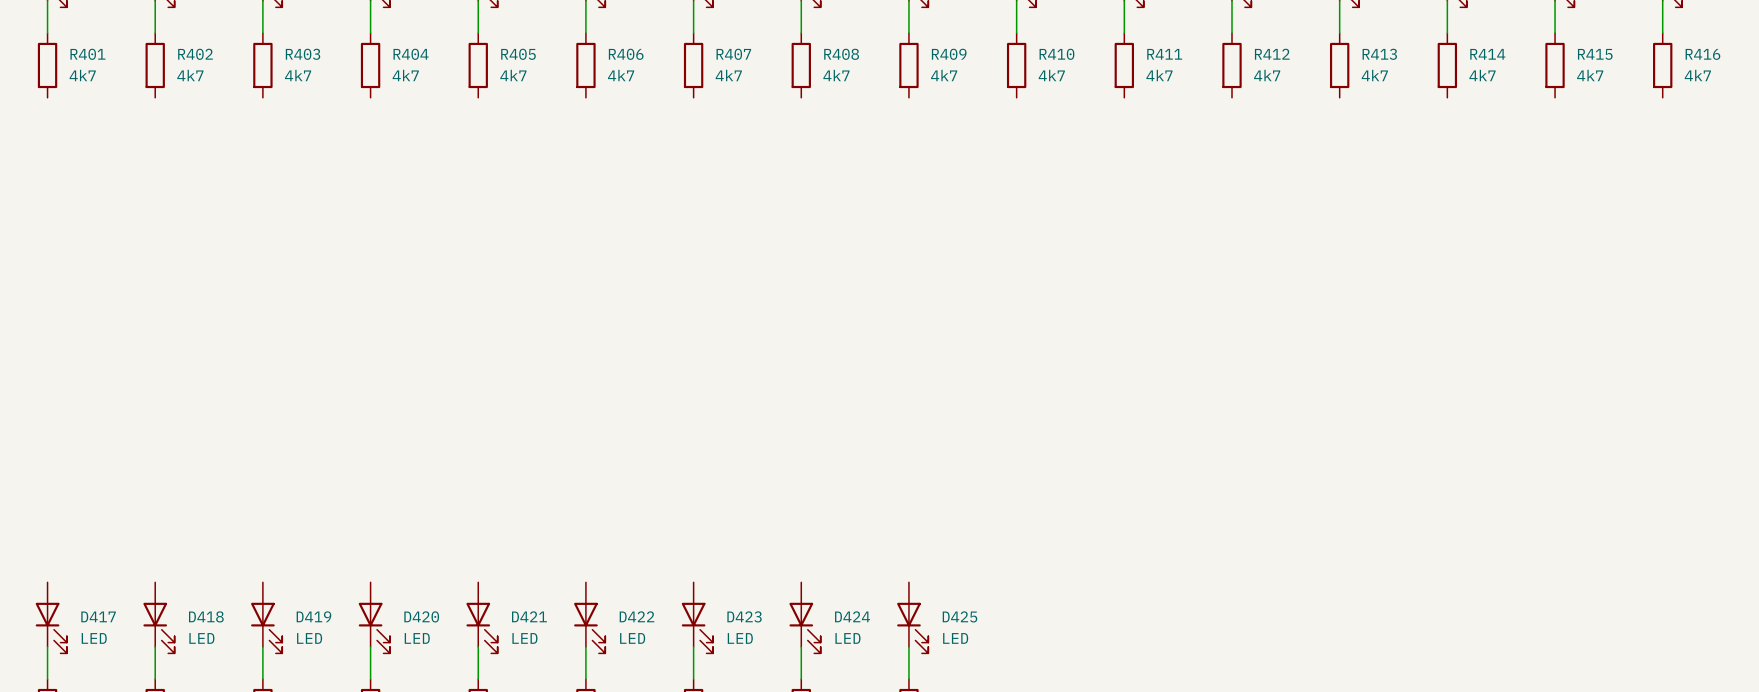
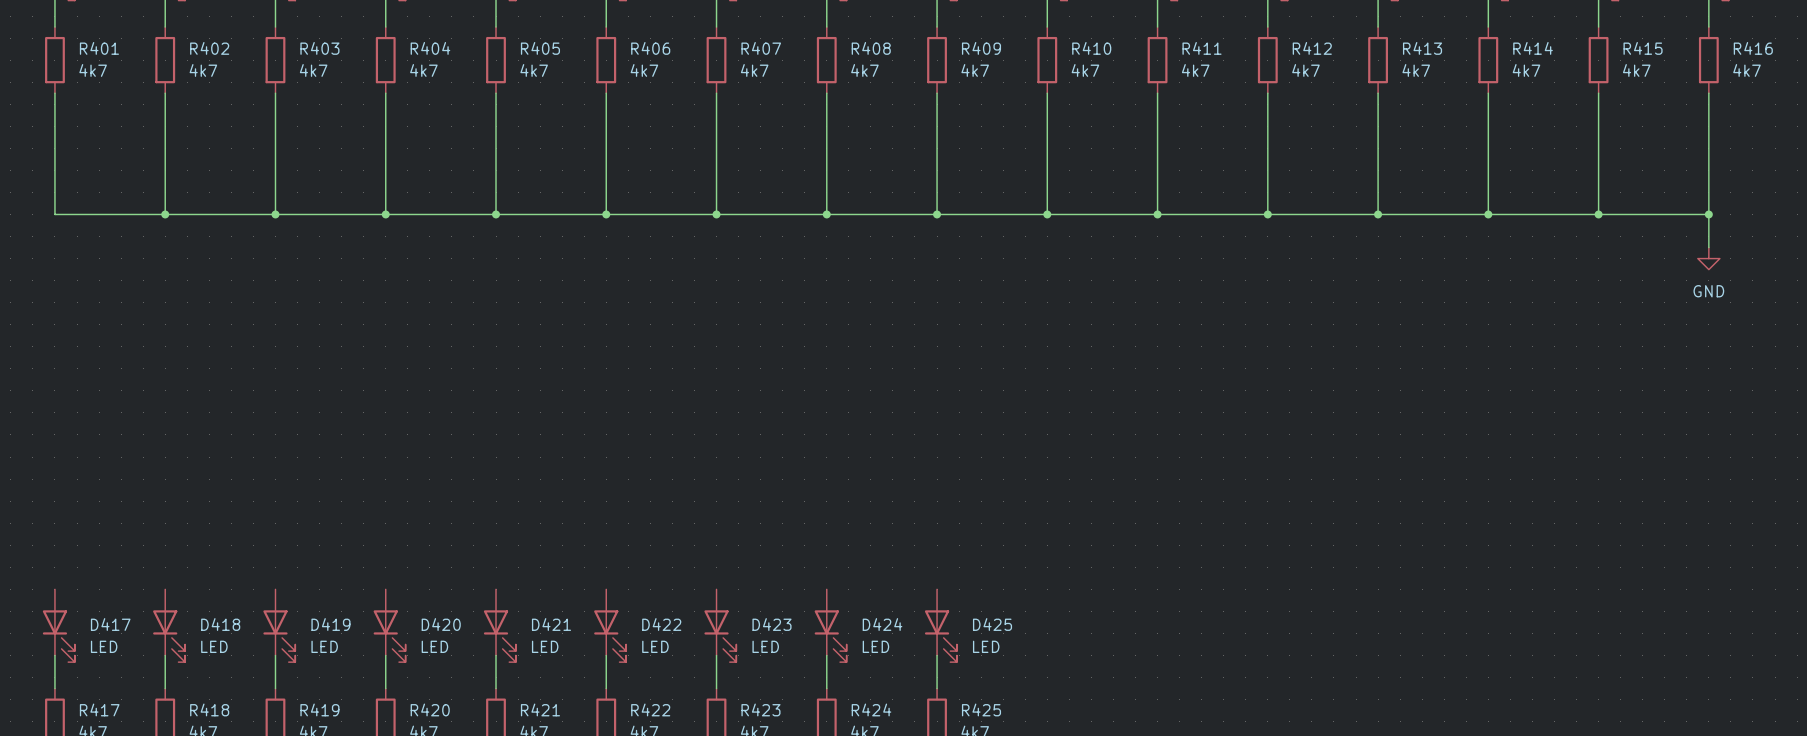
wire: none -> (54, 93) (54, 214) (1708, 214)
wire: none -> (165, 93) (165, 214)
wire: none -> (275, 93) (275, 214)
wire: none -> (385, 93) (385, 214)
wire: none -> (496, 93) (496, 214)
wire: none -> (606, 93) (606, 214)
wire: none -> (716, 93) (716, 214)
wire: none -> (826, 93) (826, 214)
wire: none -> (937, 93) (937, 214)
wire: none -> (1047, 93) (1047, 214)
wire: none -> (1157, 93) (1157, 214)
wire: none -> (1267, 93) (1267, 214)
wire: none -> (1378, 93) (1378, 214)
wire: none -> (1488, 93) (1488, 214)
wire: none -> (1598, 93) (1598, 214)
wire: none -> (1708, 93) (1708, 247)
junction: none -> (165, 214)
junction: none -> (275, 214)
junction: none -> (385, 214)
junction: none -> (496, 214)
junction: none -> (606, 214)
junction: none -> (716, 214)
junction: none -> (826, 214)
junction: none -> (937, 214)
junction: none -> (1047, 214)
junction: none -> (1157, 214)
junction: none -> (1267, 214)
junction: none -> (1378, 214)
junction: none -> (1488, 214)
junction: none -> (1598, 214)
junction: none -> (1708, 214)
power symbol: none -> GND (1708, 258)

